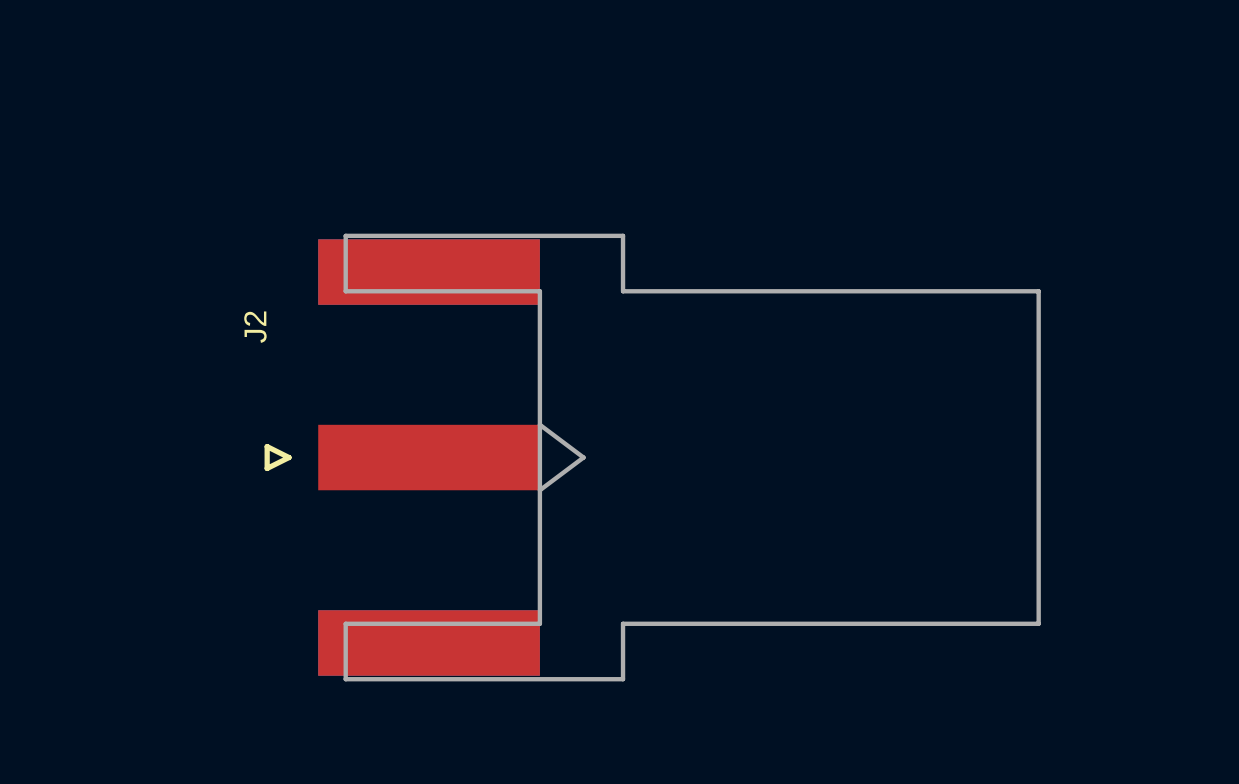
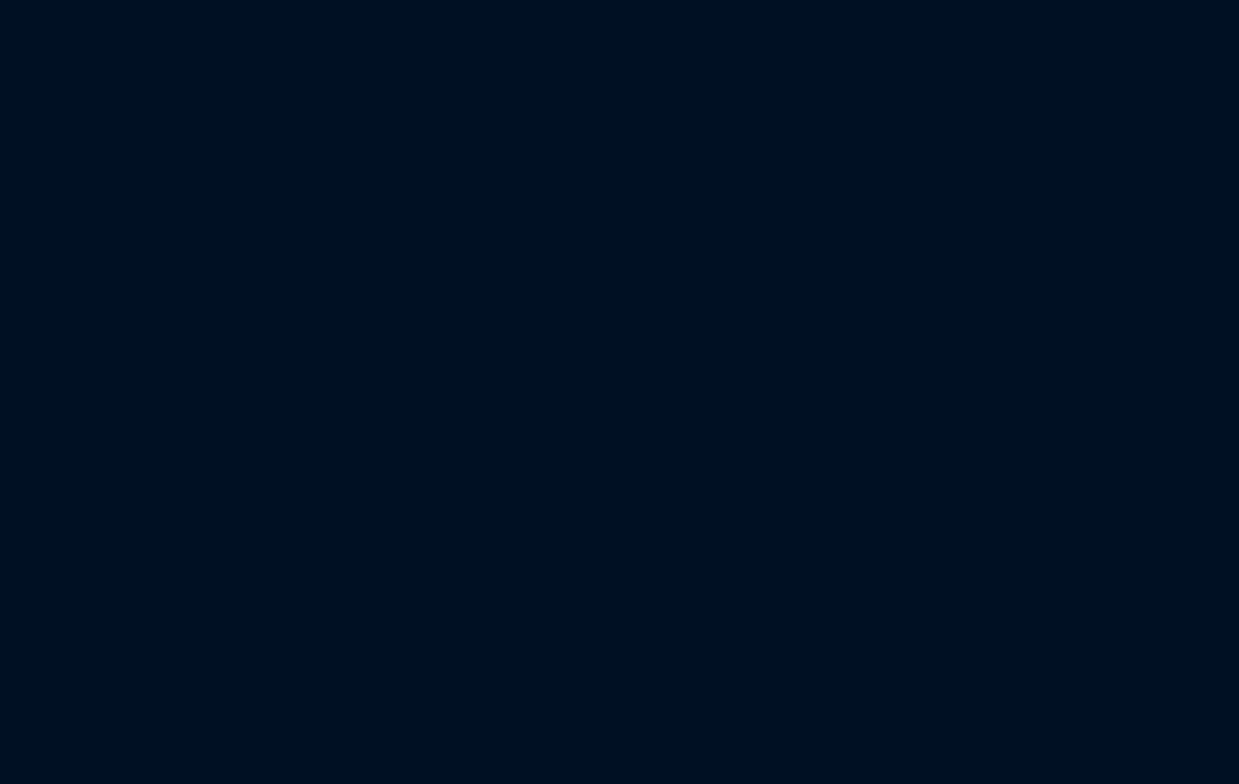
J2: (652, 457) -> none

